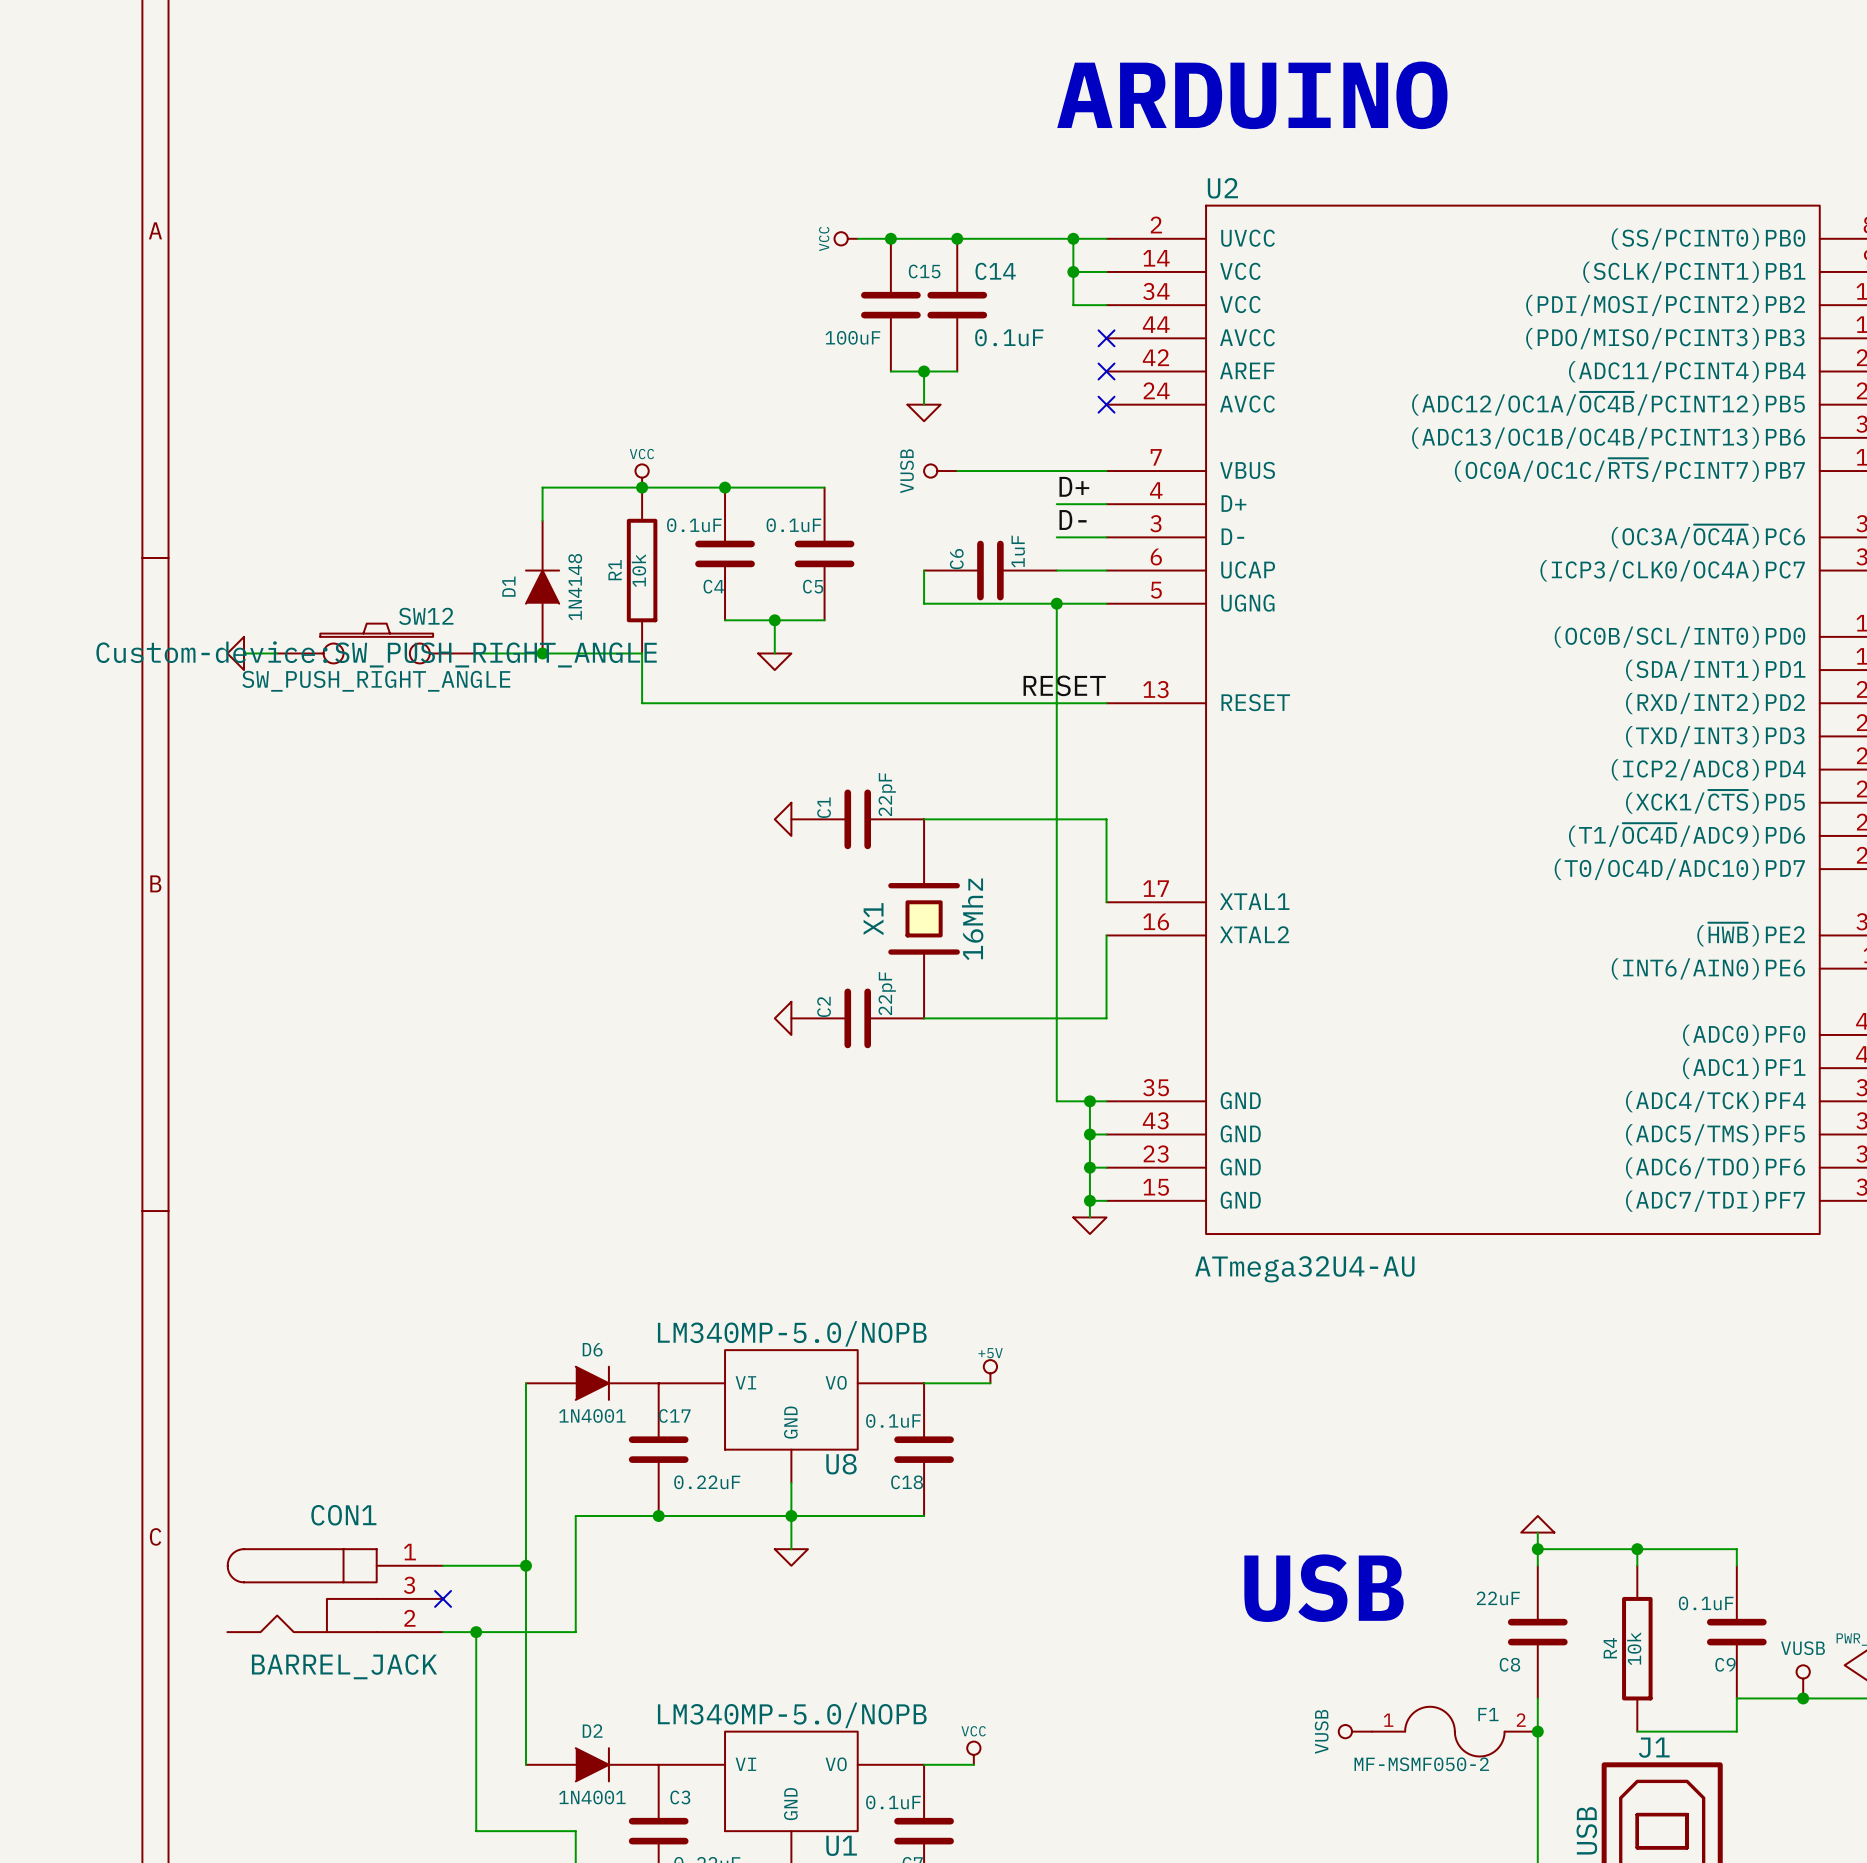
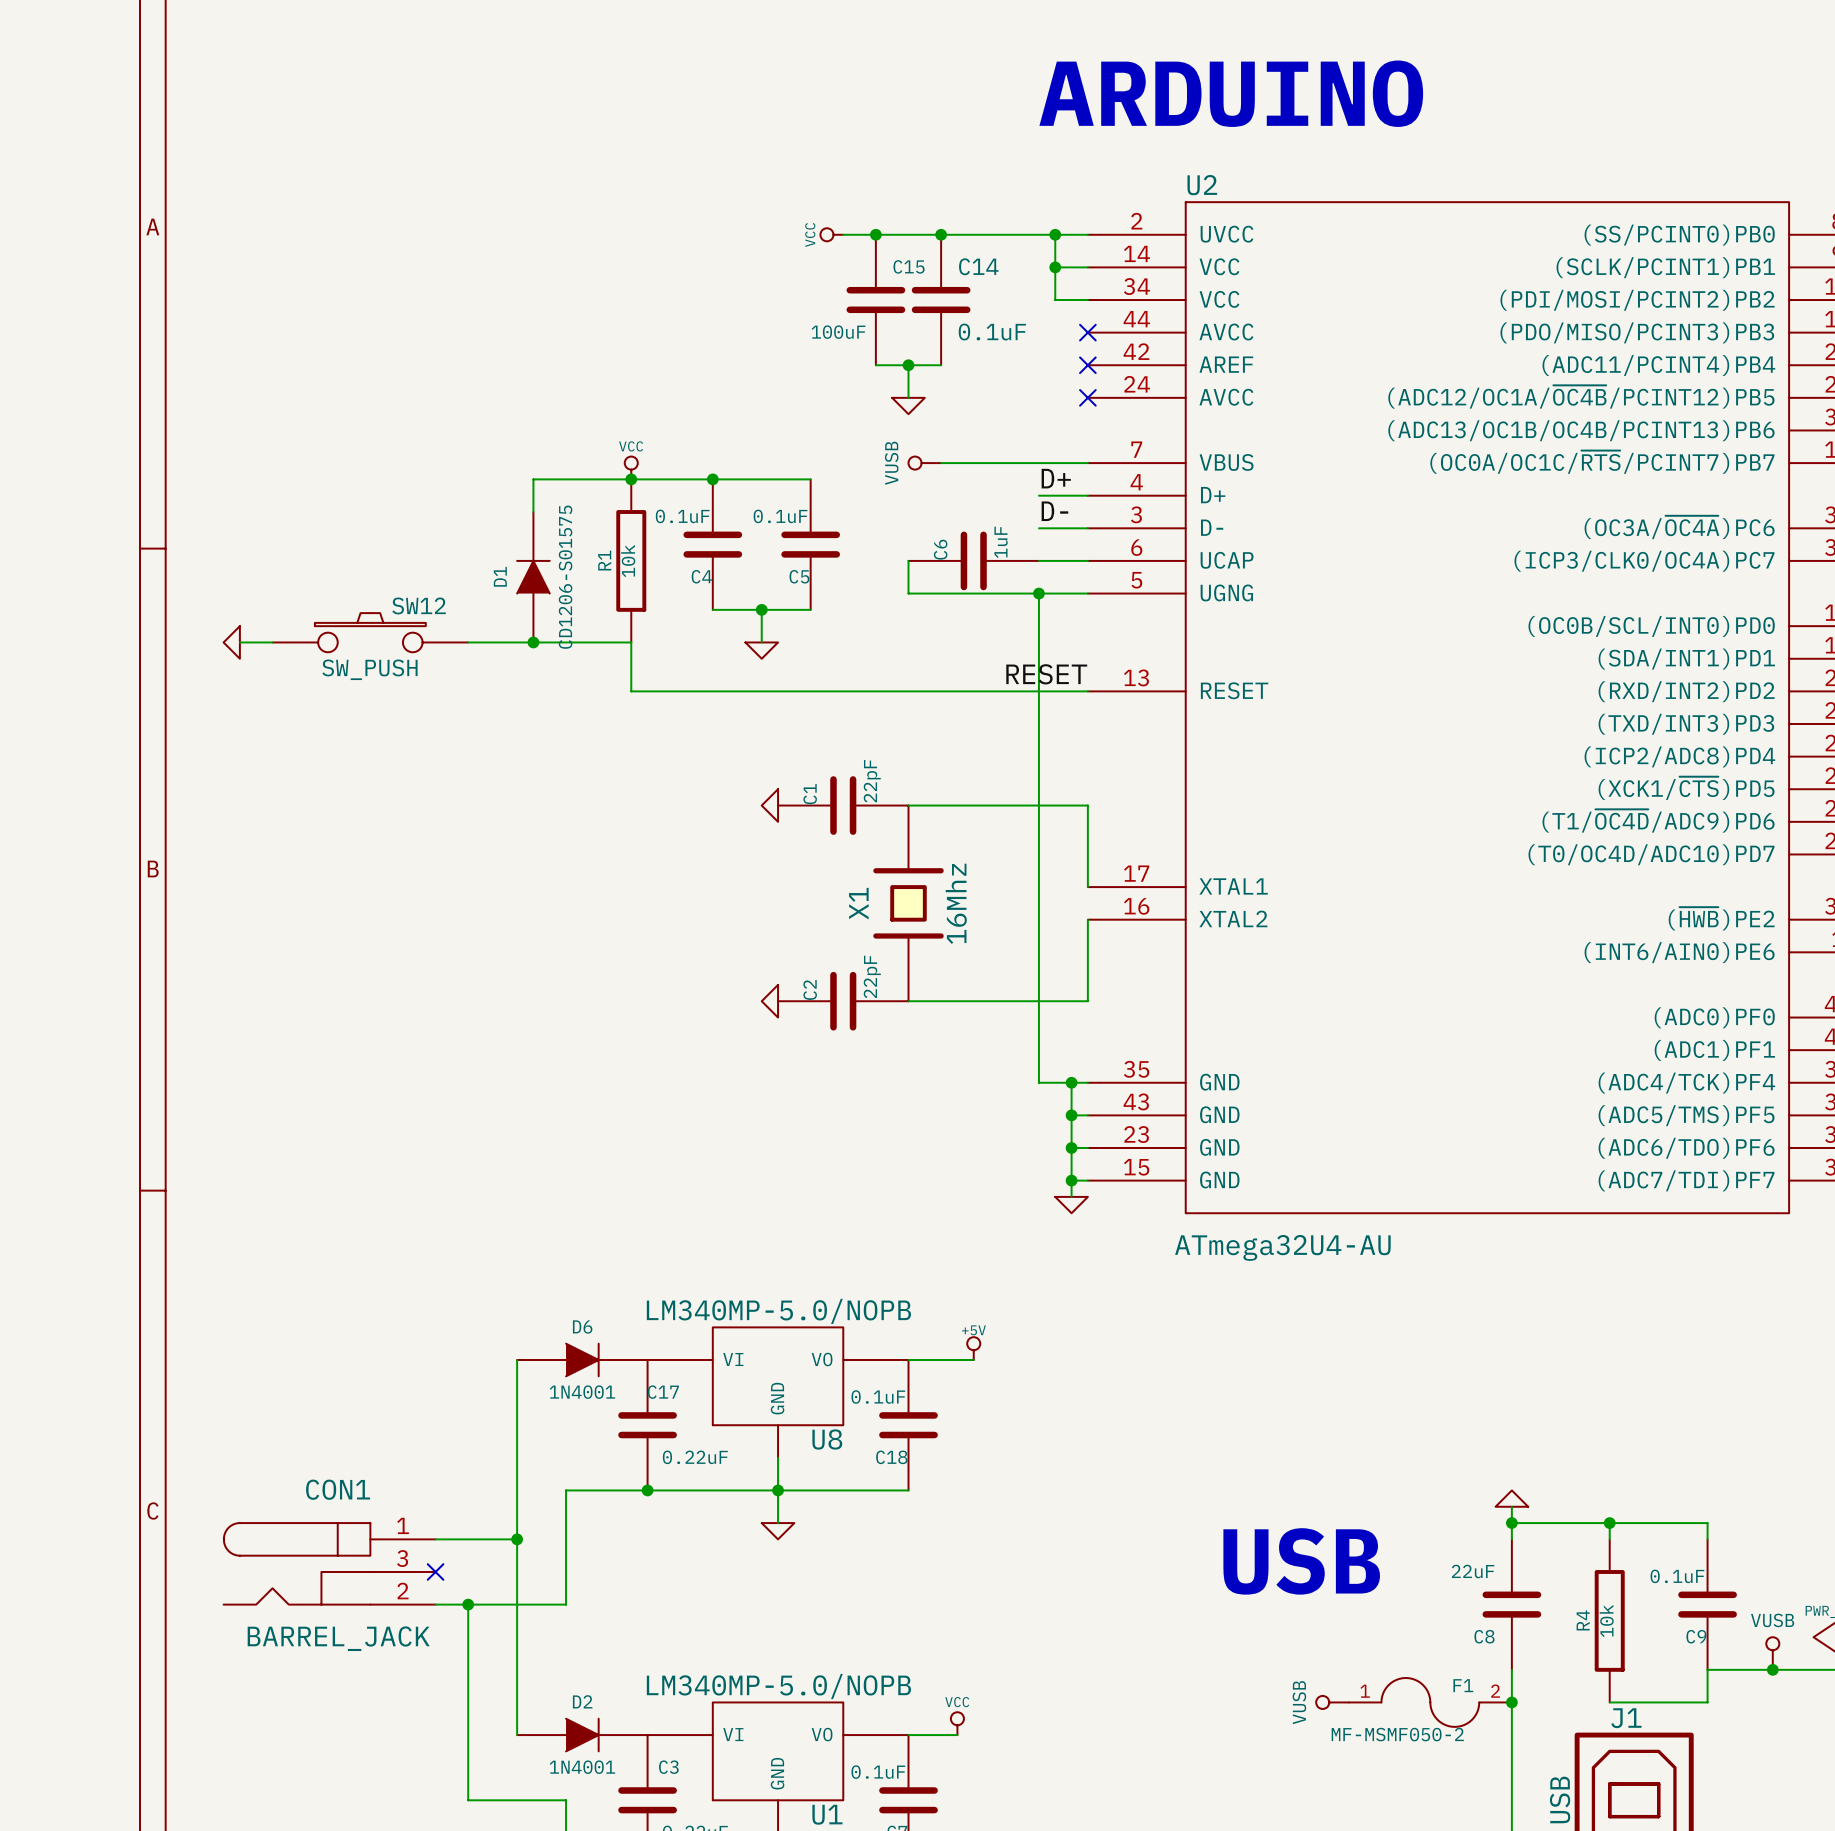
D1 value: 1N4148 (575, 587) -> CD1206-S01575 (565, 577)
SW12 text: Custom-device:SW_PUSH_RIGHT_ANGLE (376, 654) -> none
SW12 value: SW_PUSH_RIGHT_ANGLE (376, 681) -> SW_PUSH (369, 669)

